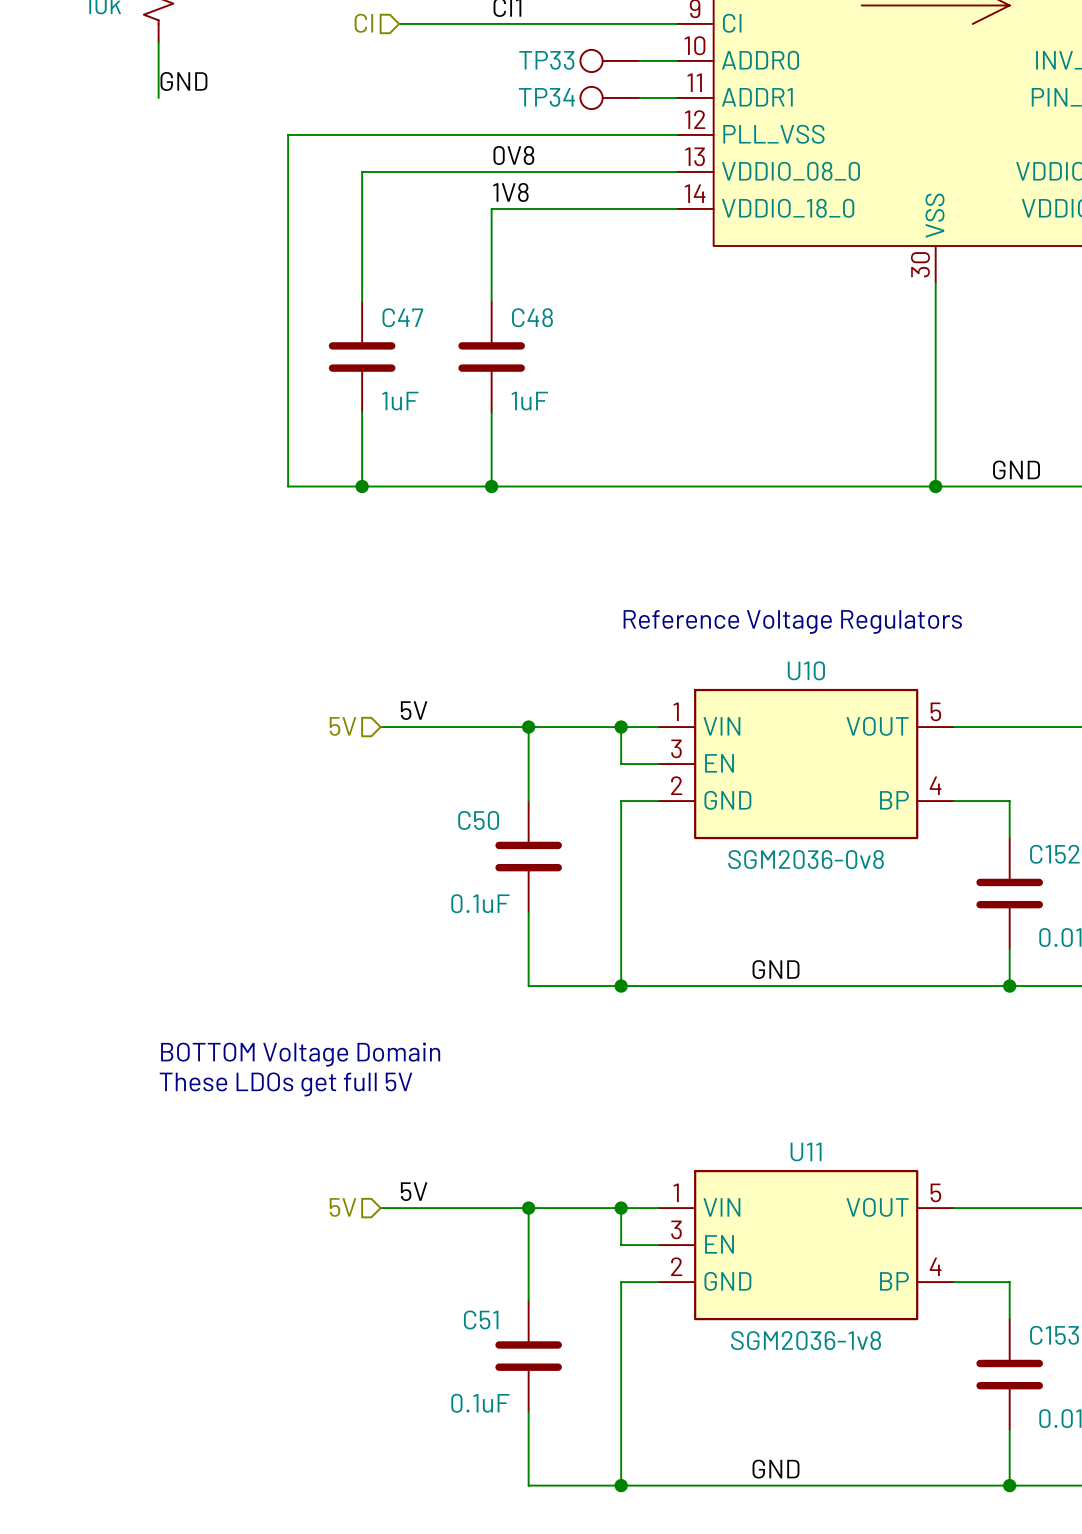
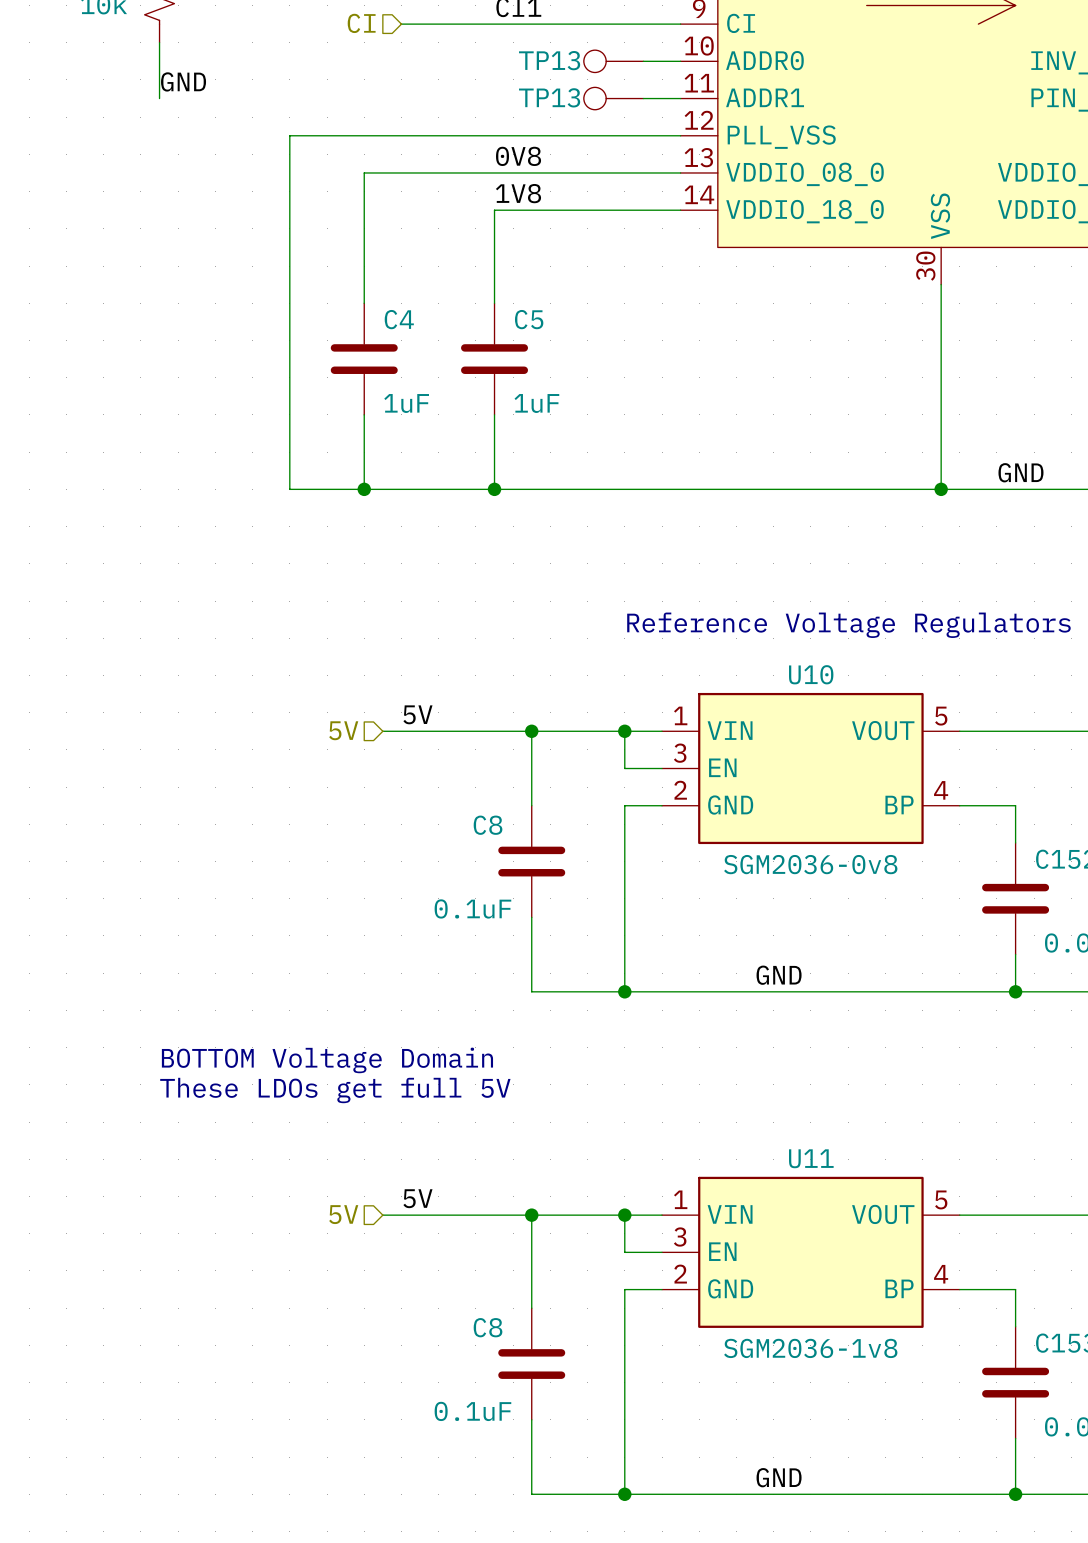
TP33 name: TP33 (546, 60) -> TP13 (549, 60)
TP34 name: TP34 (546, 97) -> TP13 (549, 97)
C47 name: C47 (402, 317) -> C4 (399, 319)
C48 name: C48 (532, 317) -> C5 (529, 319)
C50 name: C50 (478, 820) -> C8 (488, 825)
C51 name: C51 (481, 1319) -> C8 (488, 1327)

